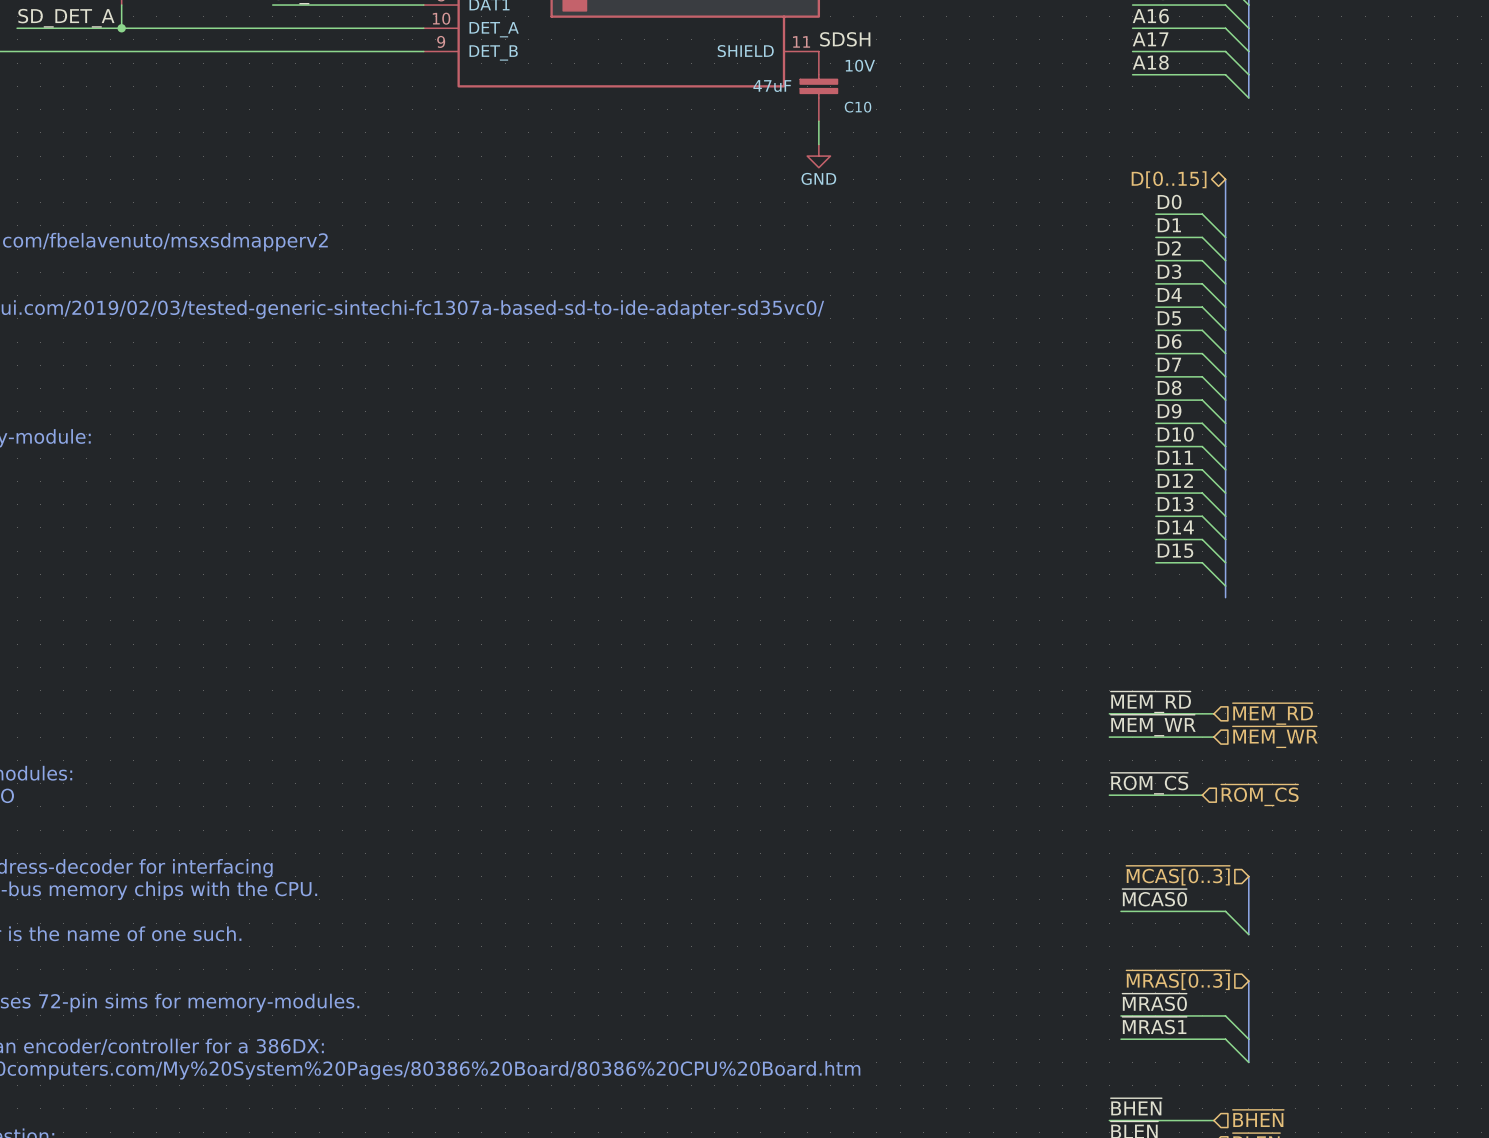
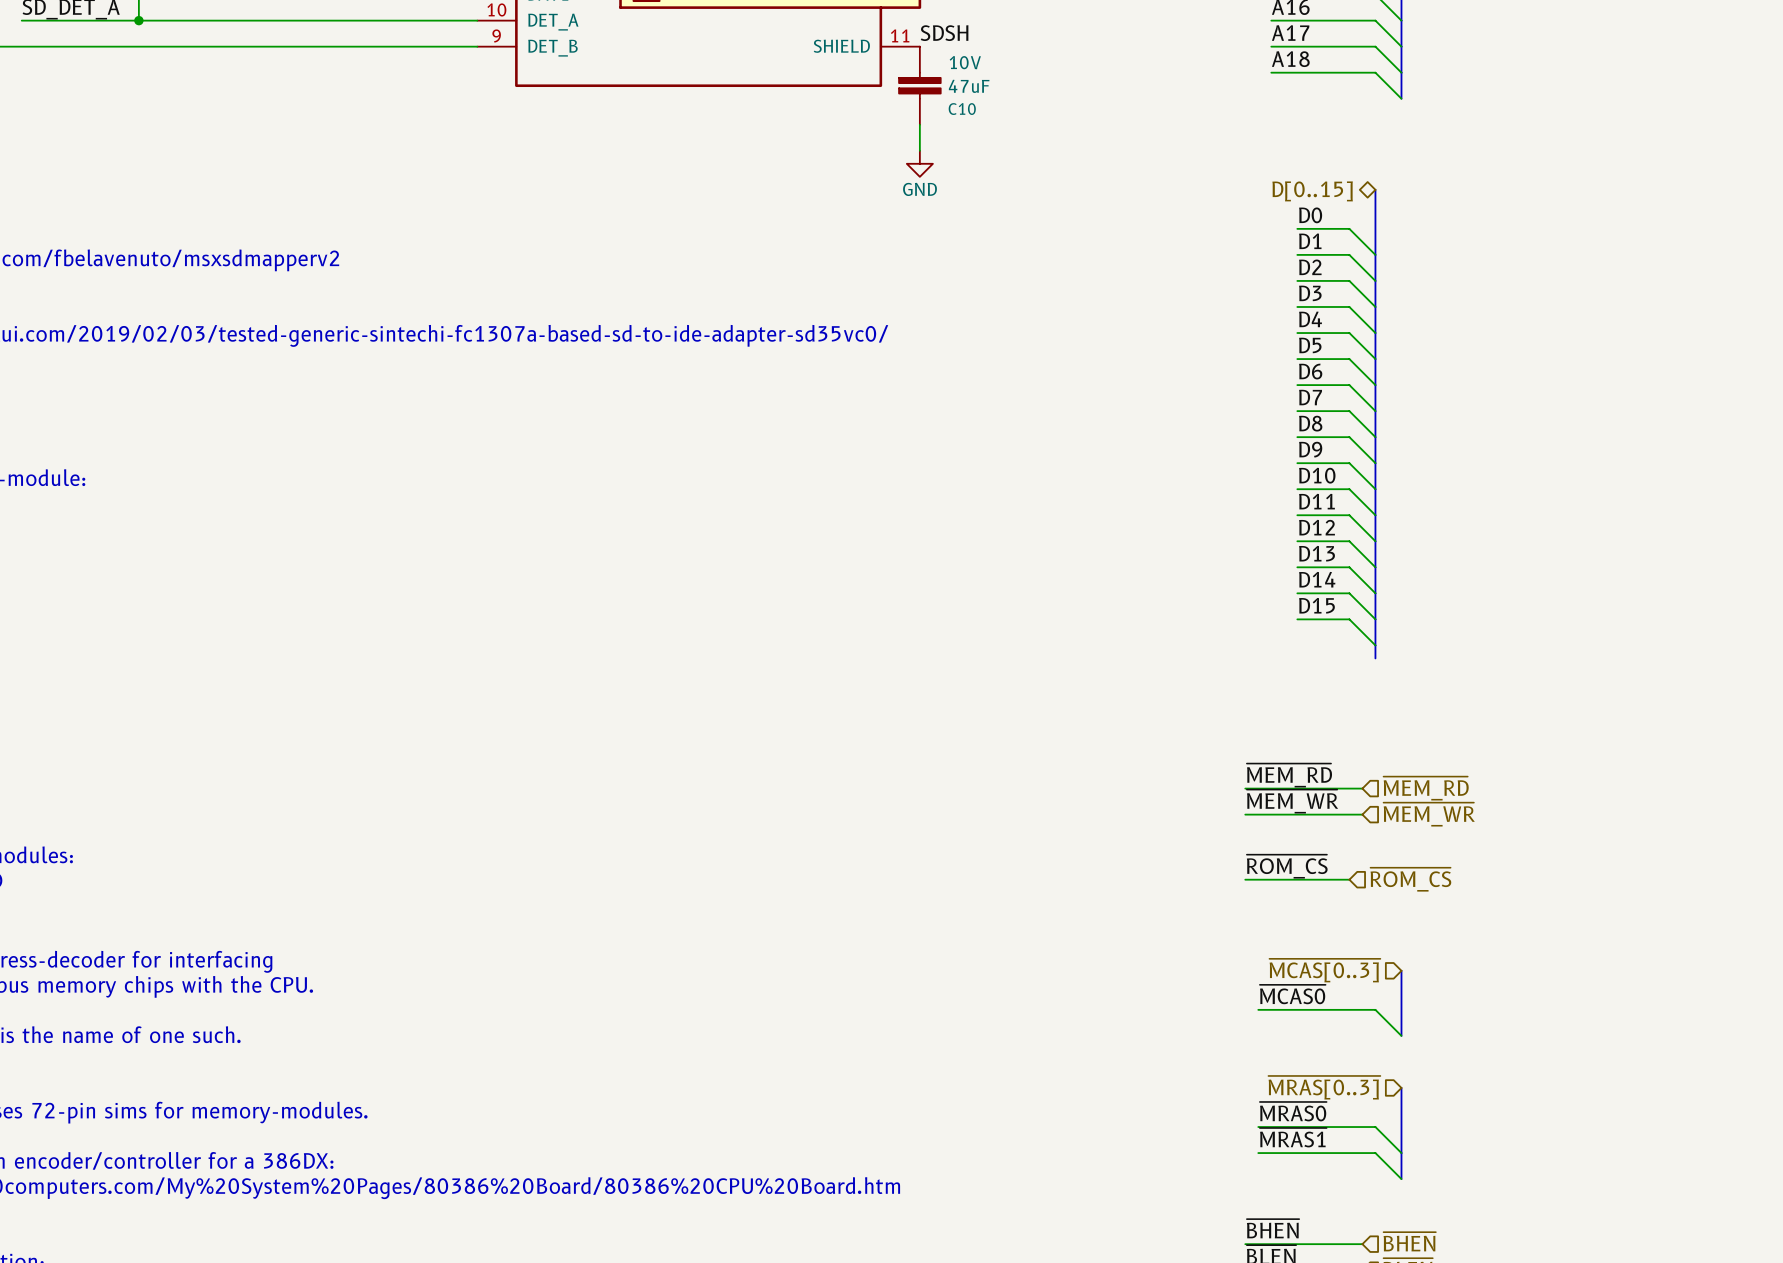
C10 text: 47uF (772, 86) -> none
C10 text: none -> 47uF (969, 86)

